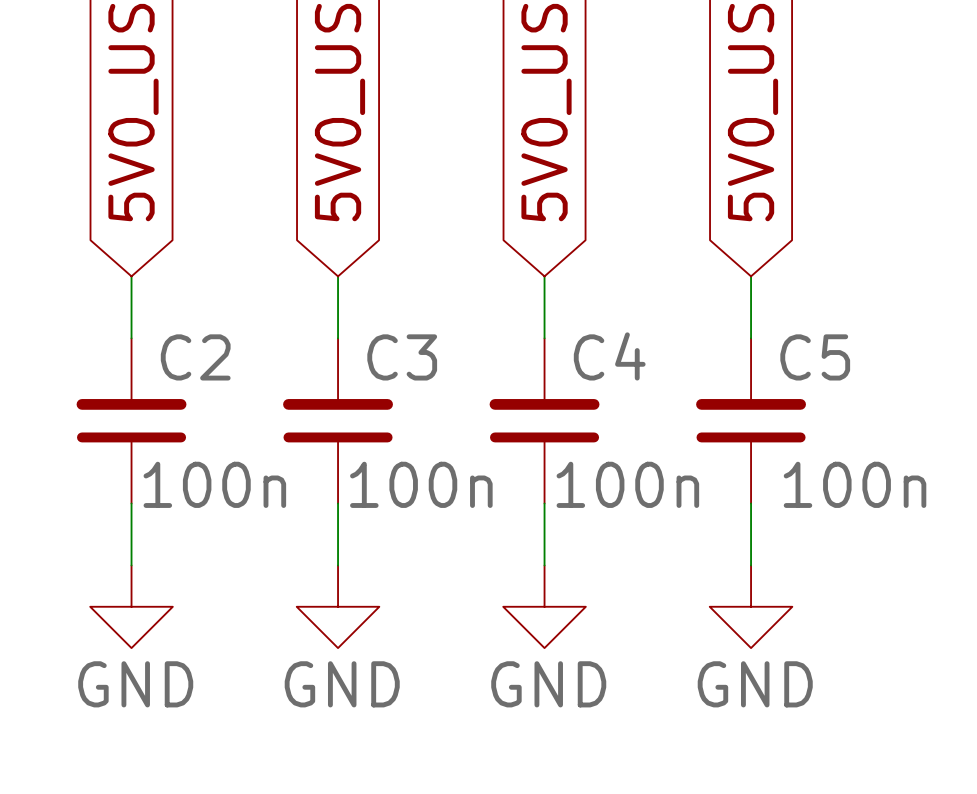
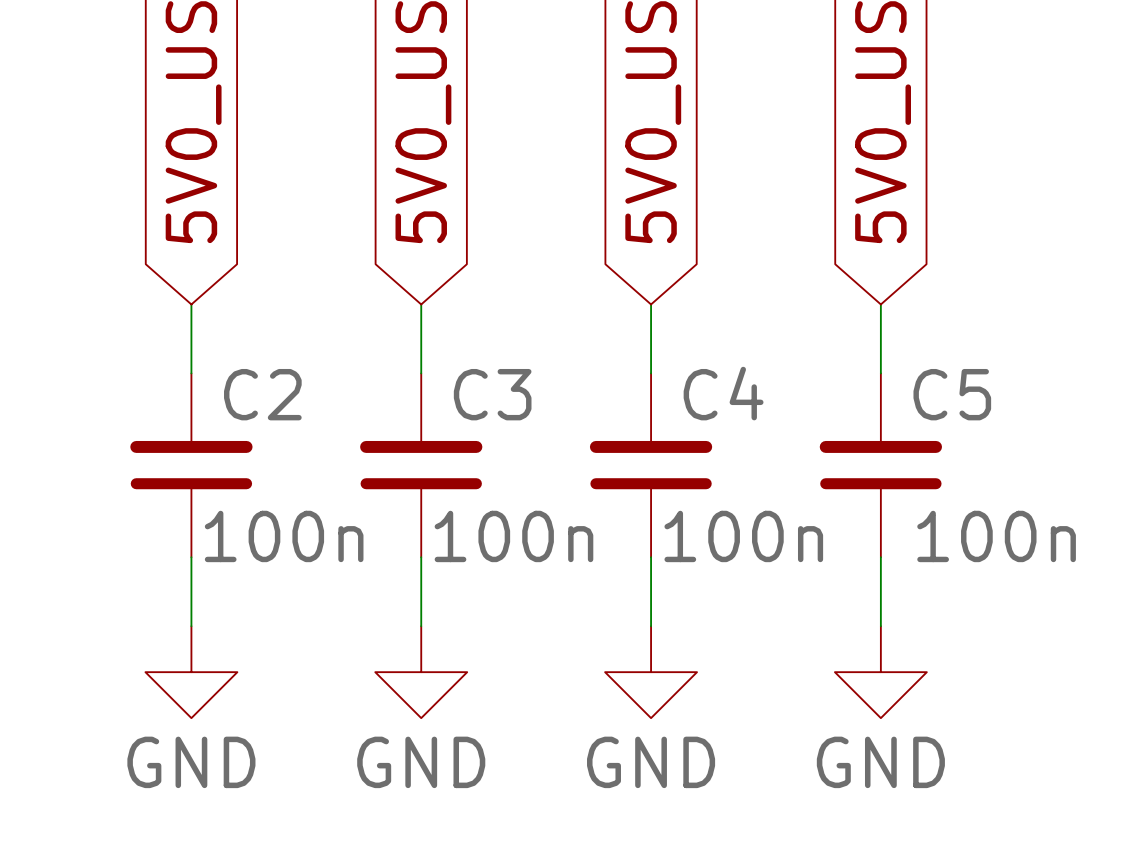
power symbol text position: GND (135, 684) -> GND (191, 762)
power symbol text position: GND (342, 684) -> GND (421, 762)
power symbol text position: GND (548, 684) -> GND (651, 762)
power symbol text position: GND (755, 684) -> GND (880, 762)

